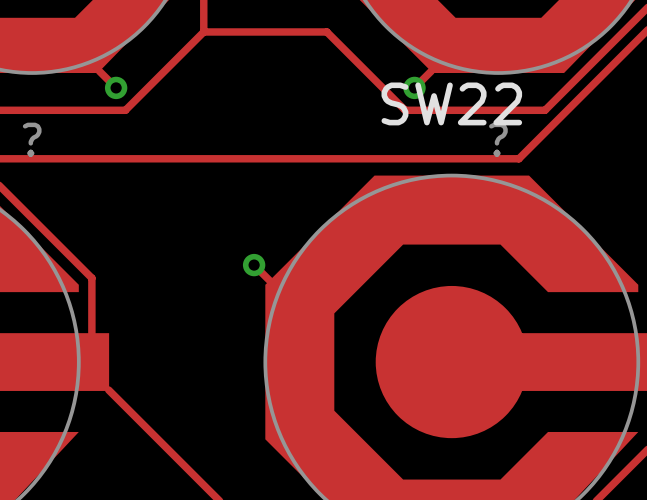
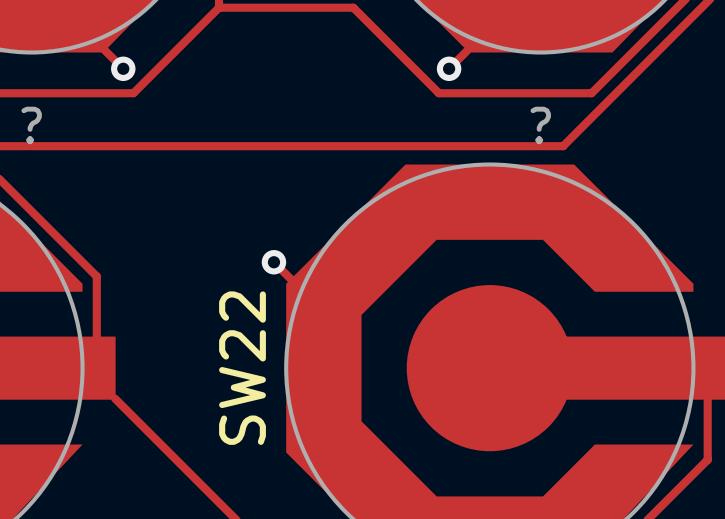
SW22 name rotation: 0° (451, 103) -> 90° counterclockwise (242, 368)
SW22 name position: SW22 (451, 103) -> SW22 (242, 368)

